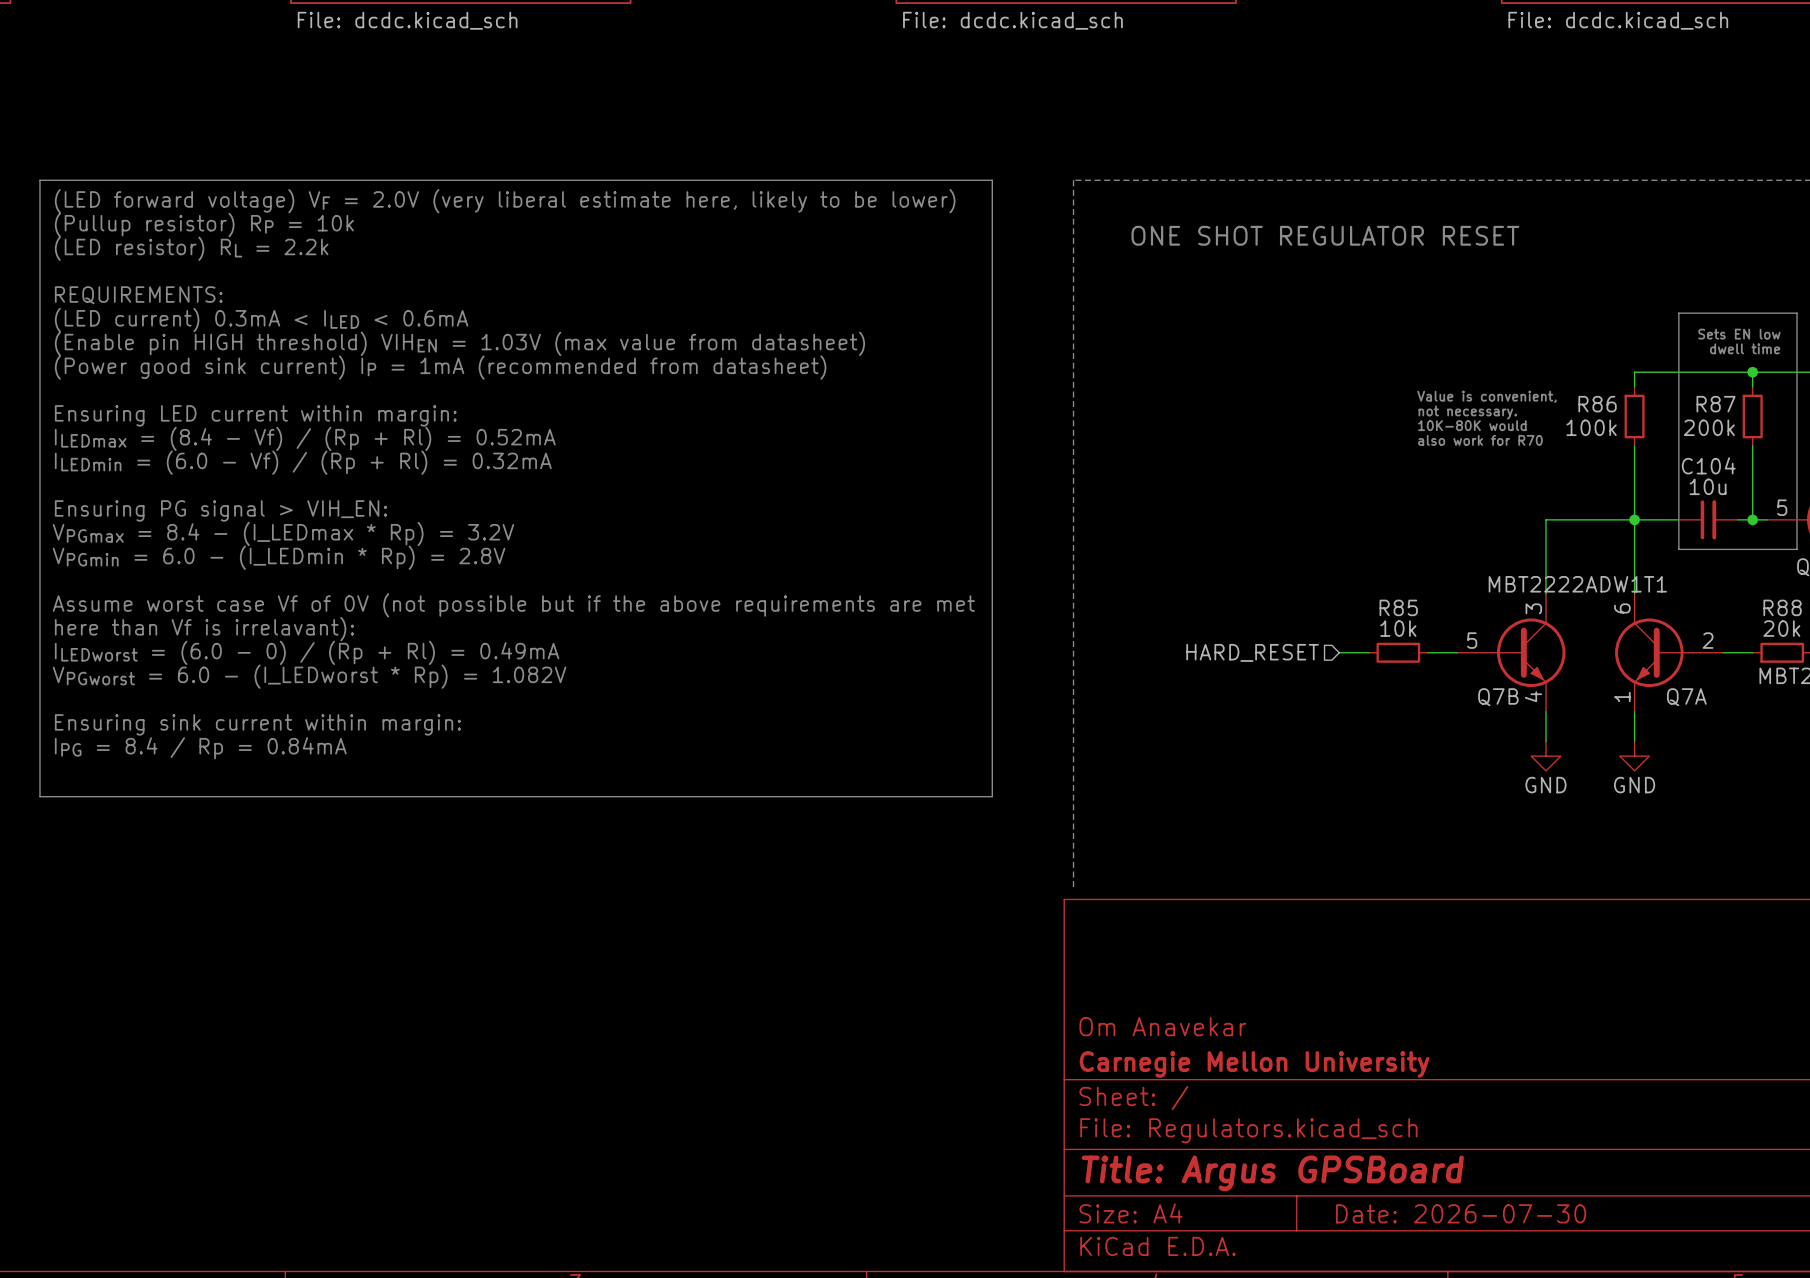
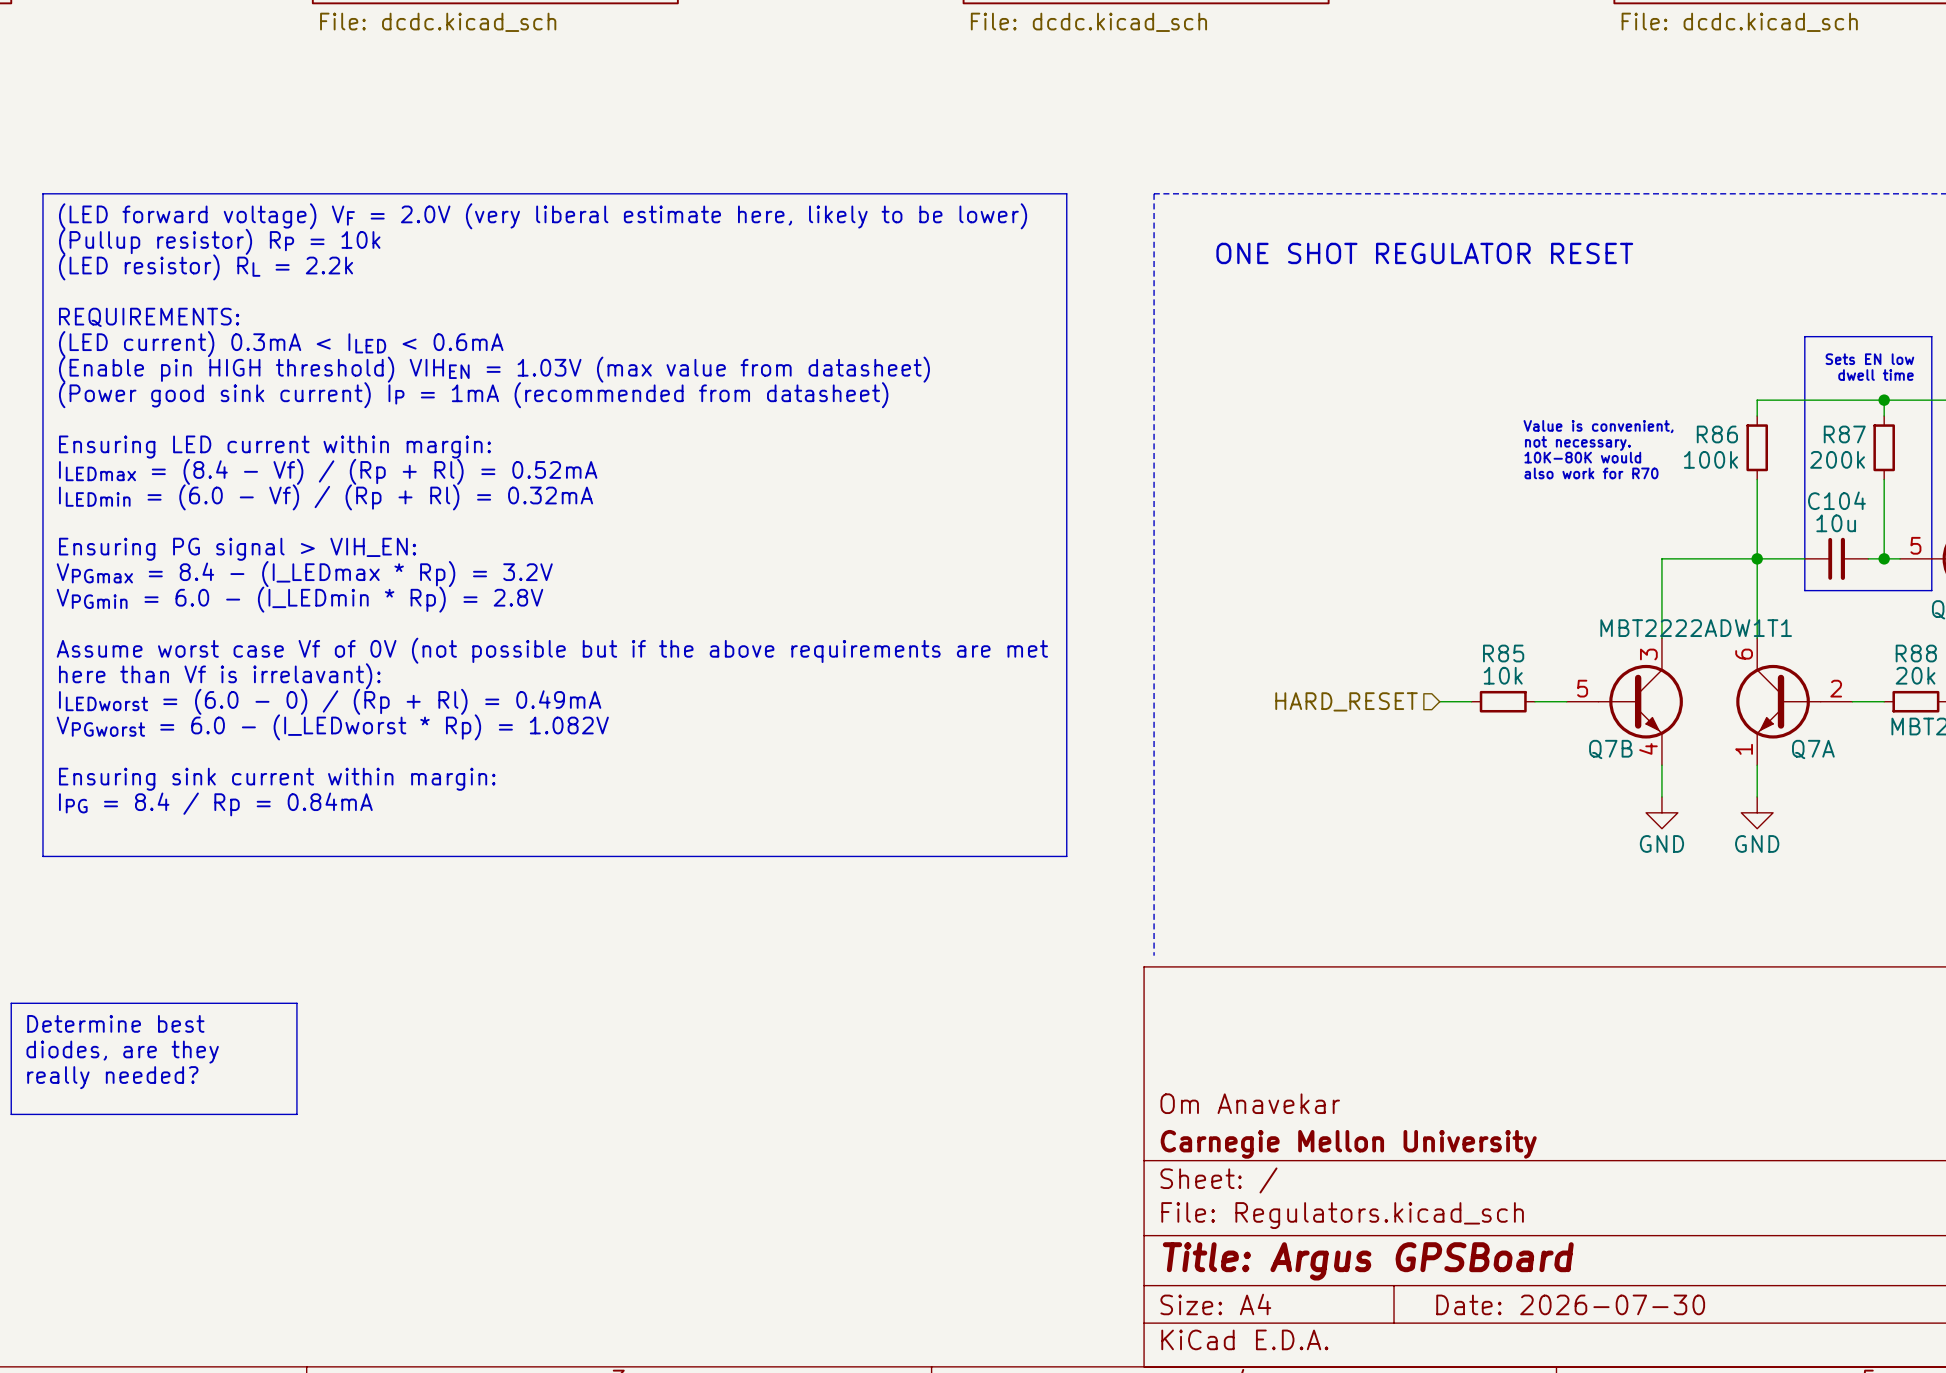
line: none -> (11, 1003) (296, 1003) (296, 1114) (11, 1114) (11, 1003)
text: none -> Determine best (115, 1023)
text: none -> diodes, are they (122, 1052)
text: none -> really needed? (112, 1077)

